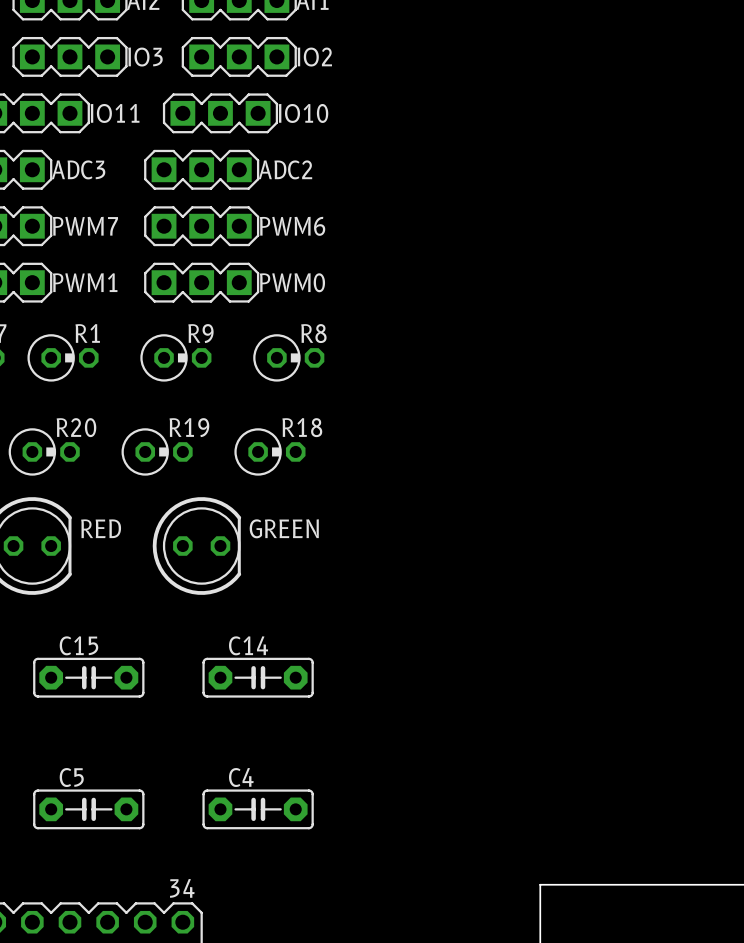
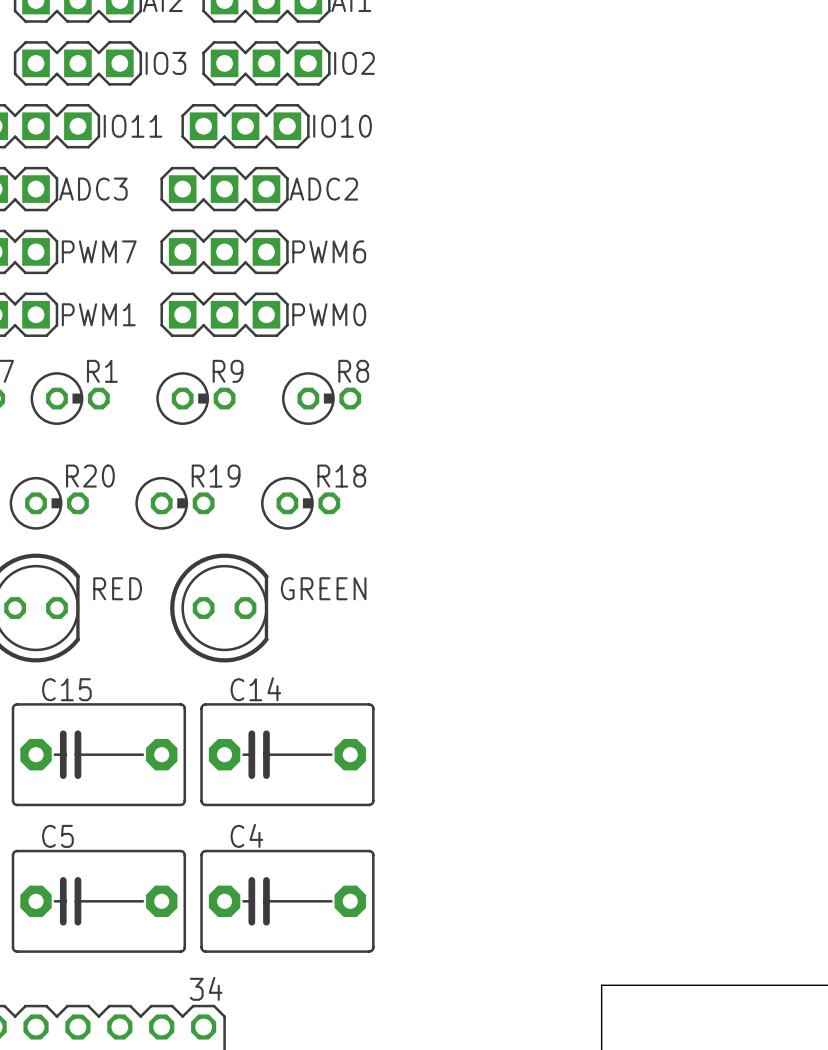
C15 name position: C15 (78, 645) -> C15 (66, 689)
C14 name position: C14 (248, 645) -> C14 (255, 689)
C15 footprint: [33, 657, 145, 698] -> [11, 703, 187, 807]
C14 footprint: [202, 657, 314, 698] -> [200, 703, 375, 807]
C5 name position: C5 (71, 777) -> C5 (57, 836)
C4 name position: C4 (241, 777) -> C4 (246, 835)
C5 footprint: [33, 789, 145, 830] -> [11, 849, 187, 953]
C4 footprint: [202, 789, 314, 830] -> [200, 849, 375, 953]

